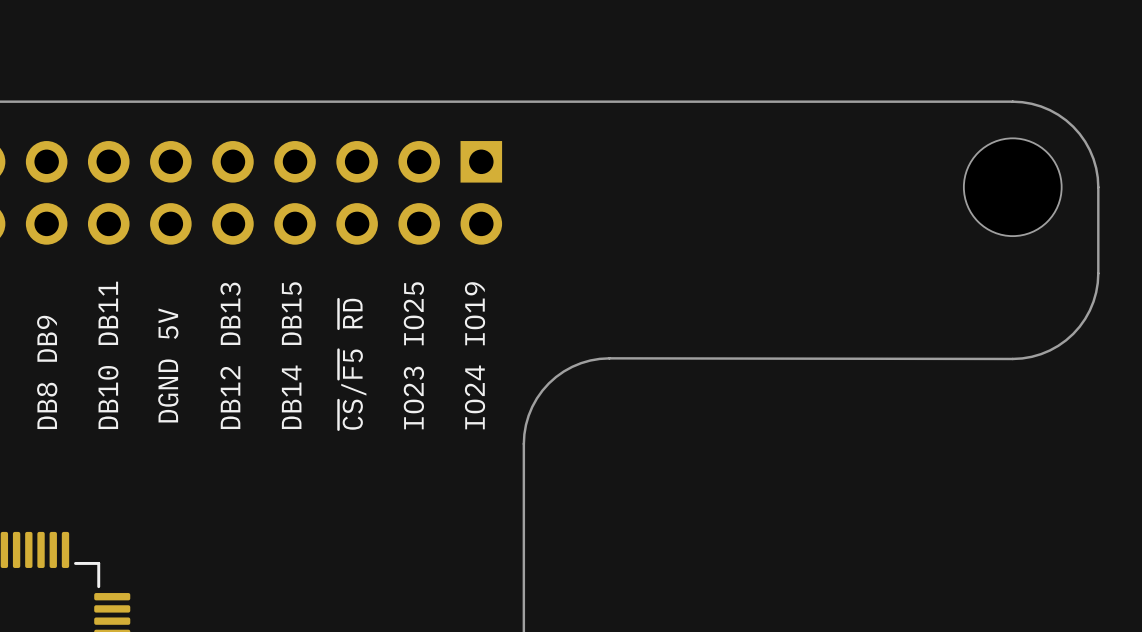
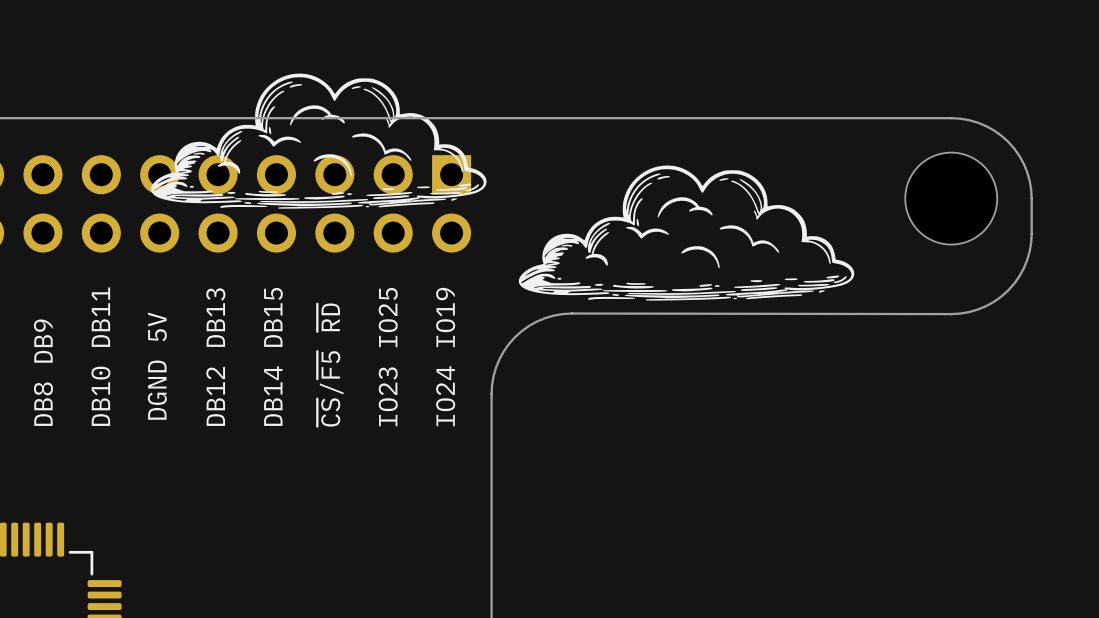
drawing: none -> [151, 73, 487, 209]
drawing: none -> [518, 165, 855, 301]
board edge: (1098, 224) (1097, 282) (1089, 310) (1073, 333) (1058, 345) (1041, 354) (1012, 358) (609, 358) (590, 360) (563, 371) (542, 390) (528, 415) (523, 443) -> (1031, 233) (1027, 260) (1014, 283) (994, 301) (969, 312) (951, 314) (572, 313) (545, 318) (529, 325) (515, 337) (499, 359) (492, 384) (491, 439)

